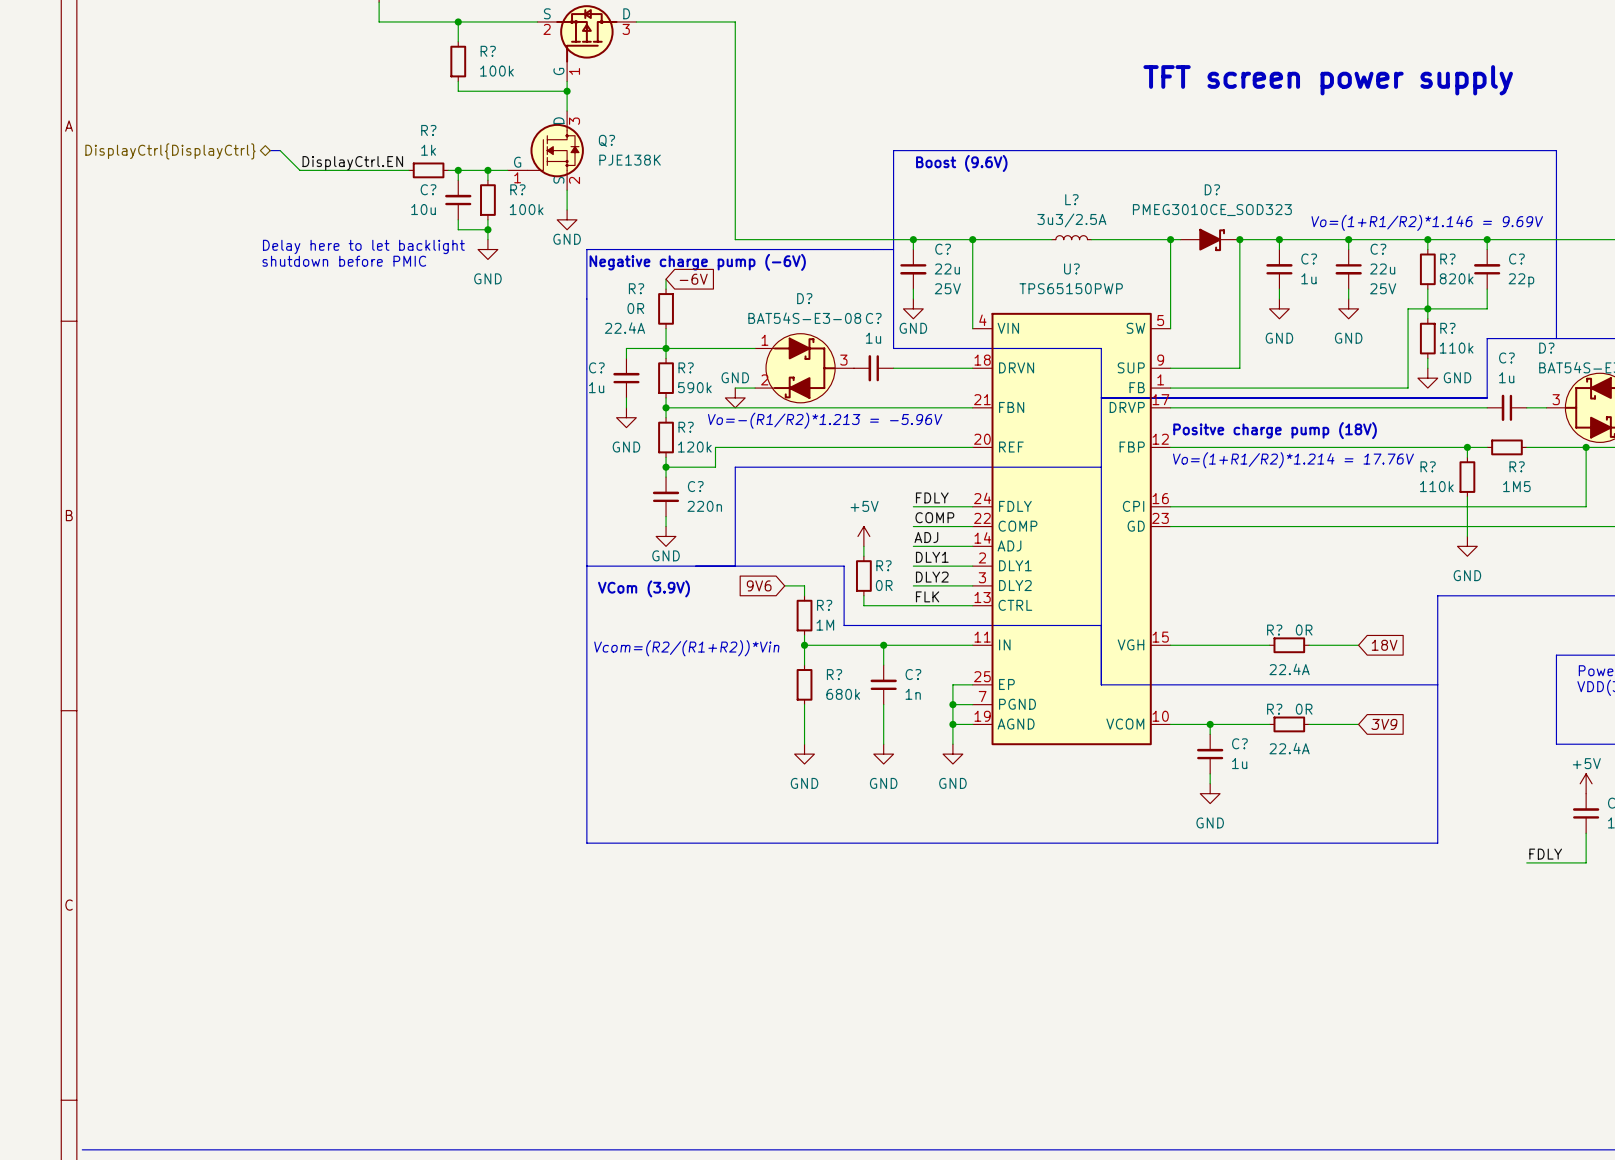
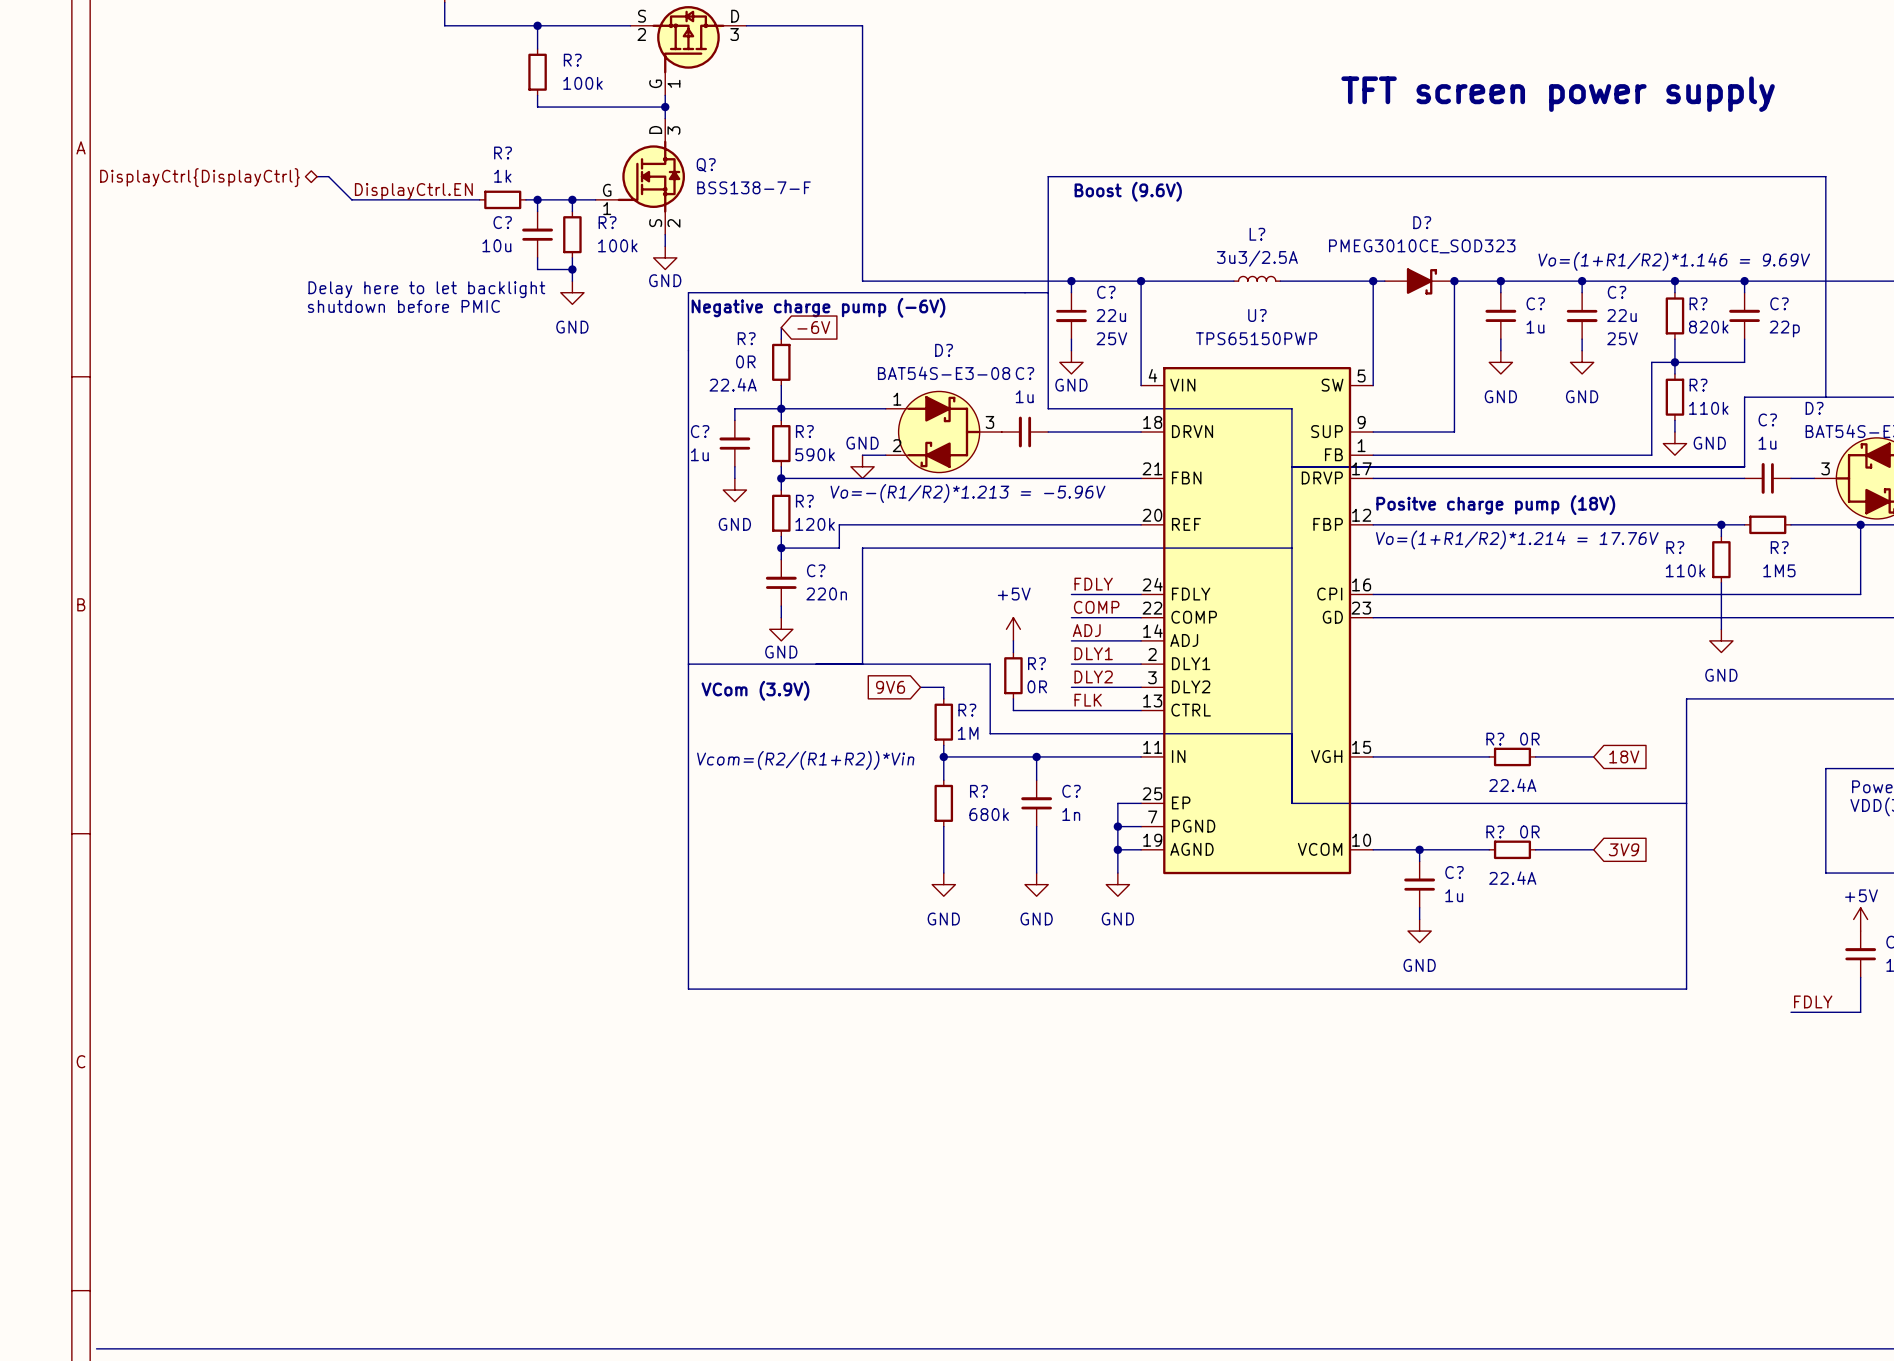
Q? symbol: [507, 111, 584, 191] -> [595, 118, 685, 235]
Q? value: PJE138K (630, 160) -> BSS138-7-F (754, 187)

